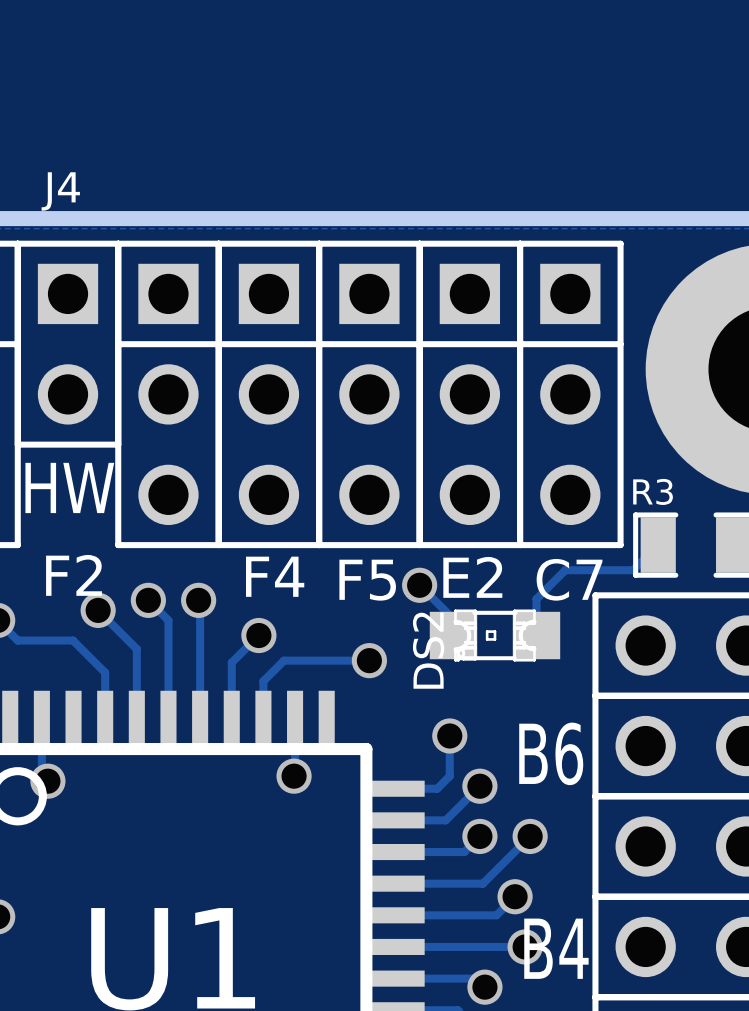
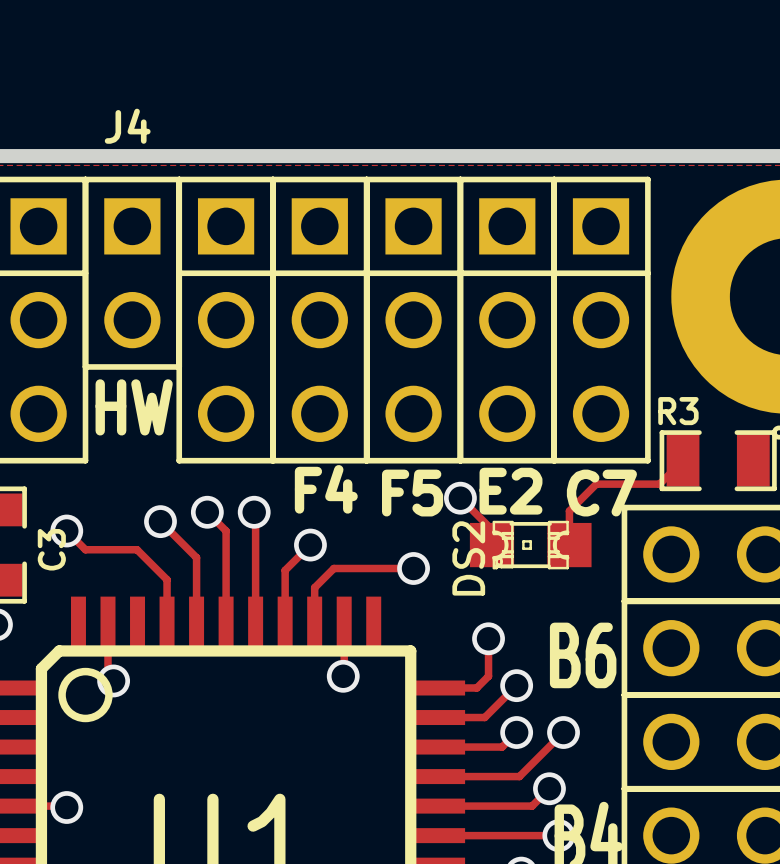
text: F2 (73, 575) -> none

